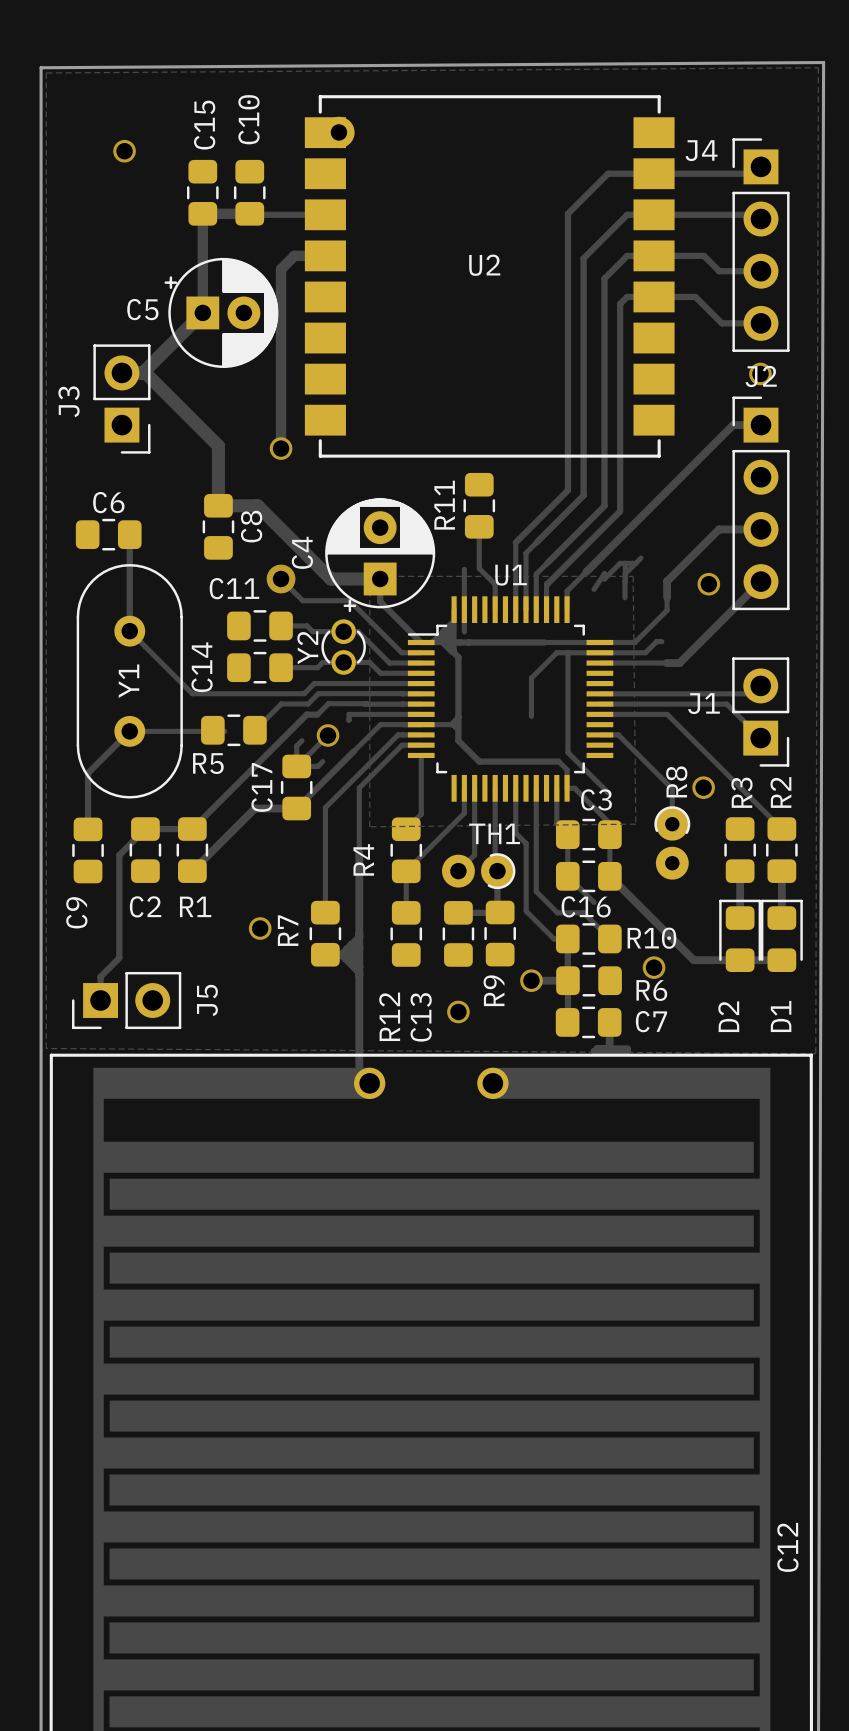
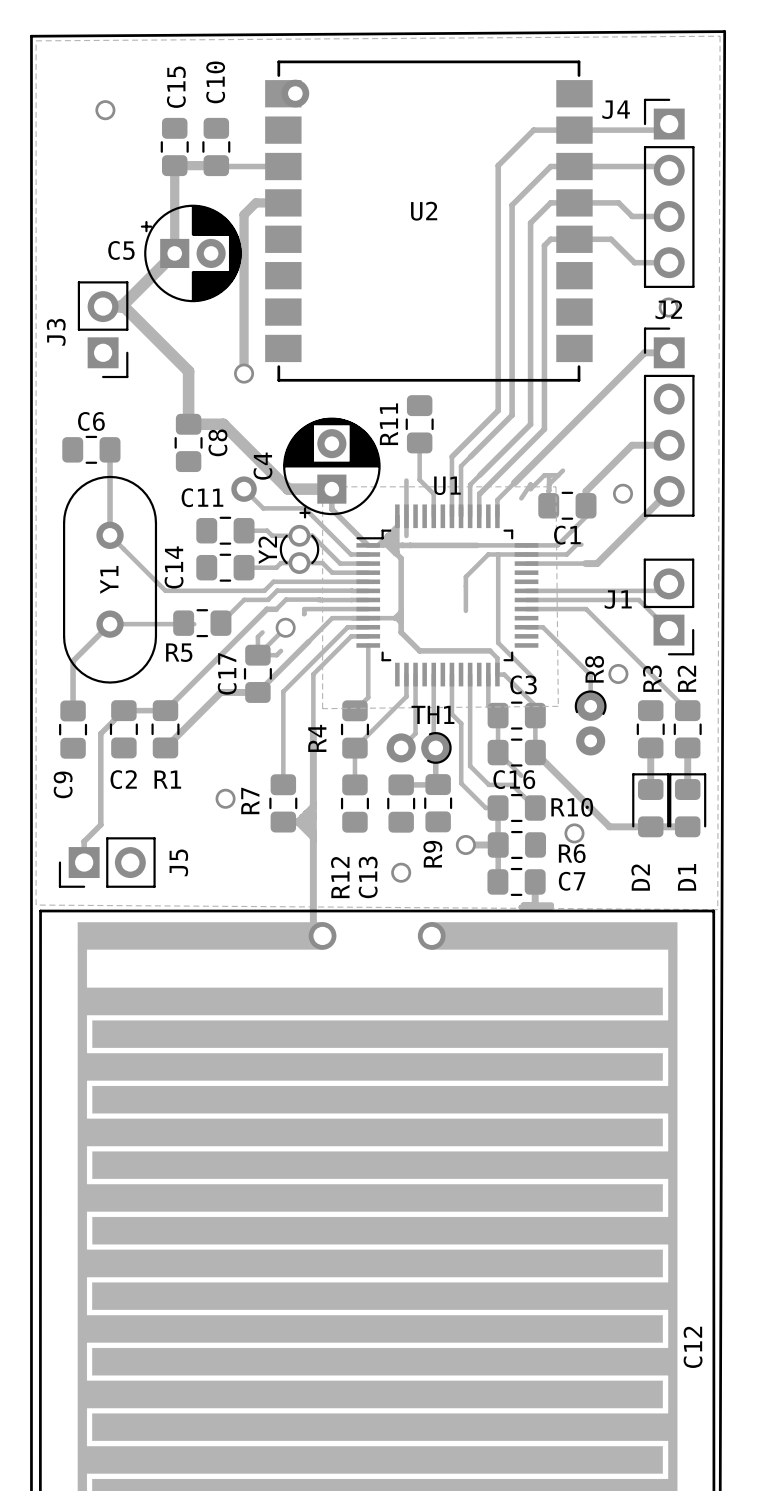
C1: none -> (567, 505)

